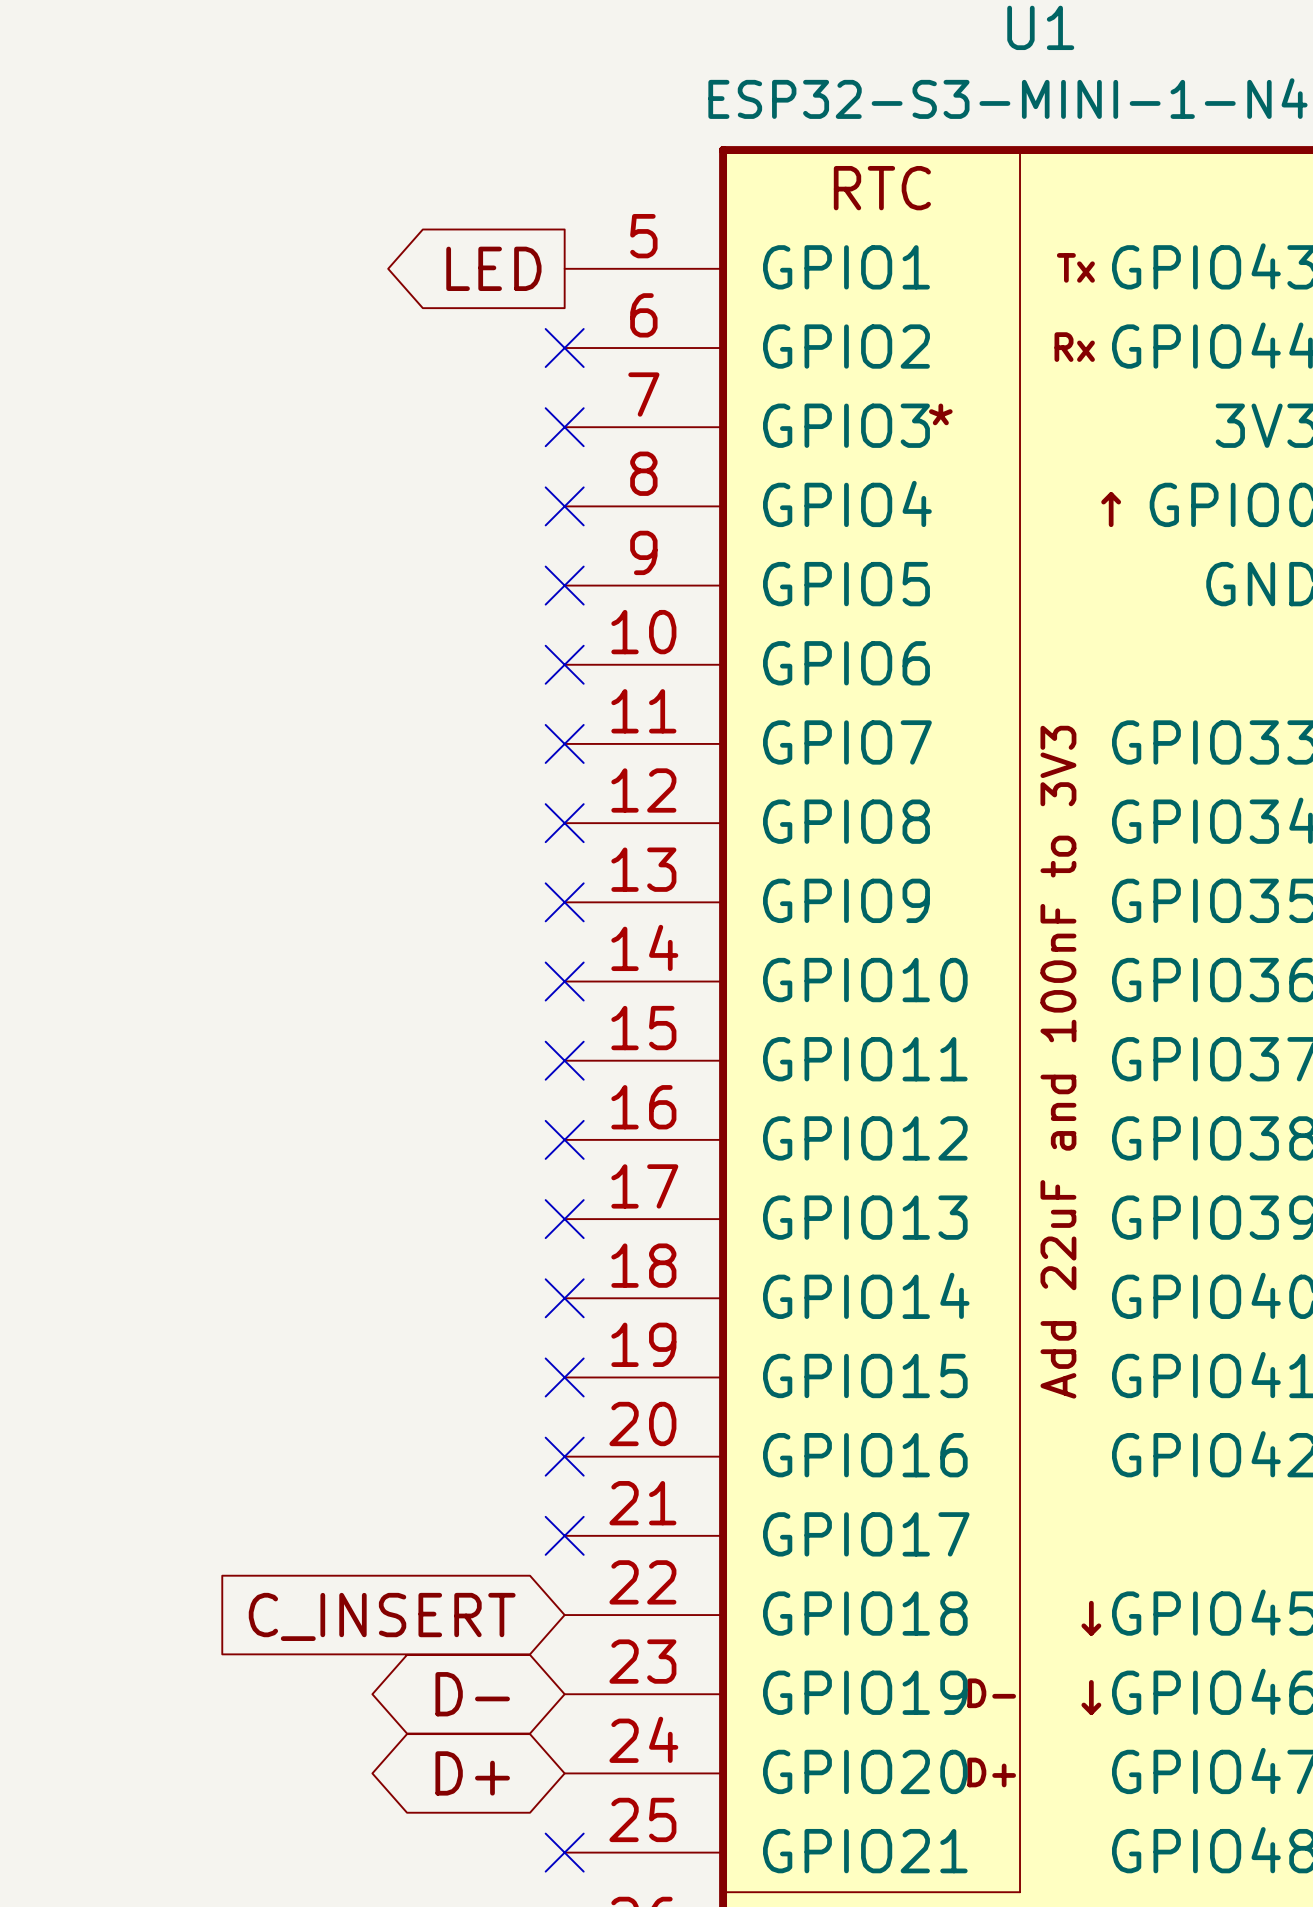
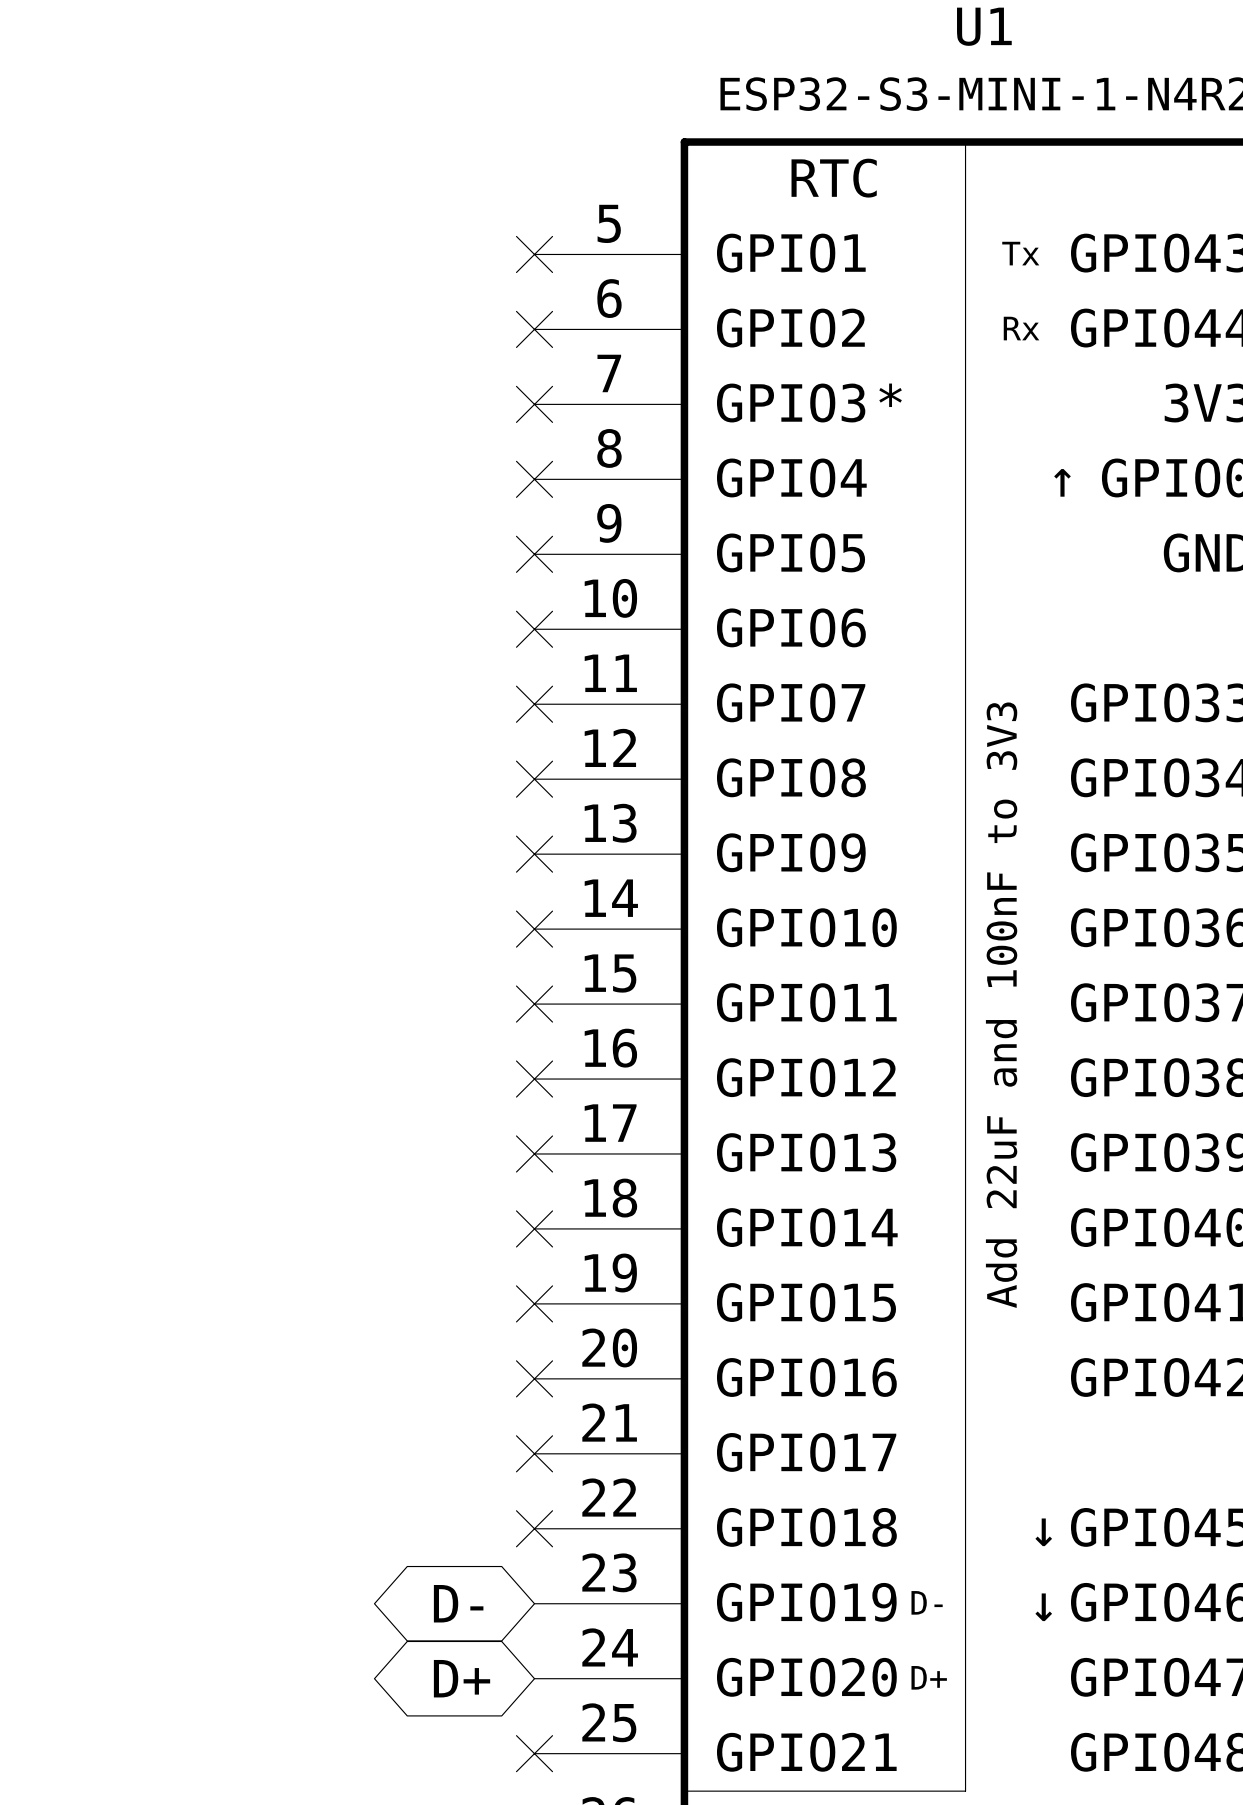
global label: LED (493, 268) -> none
no-connect mark: none -> (534, 254)
no-connect mark: none -> (534, 1528)
global label: C_INSERT (382, 1616) -> none

